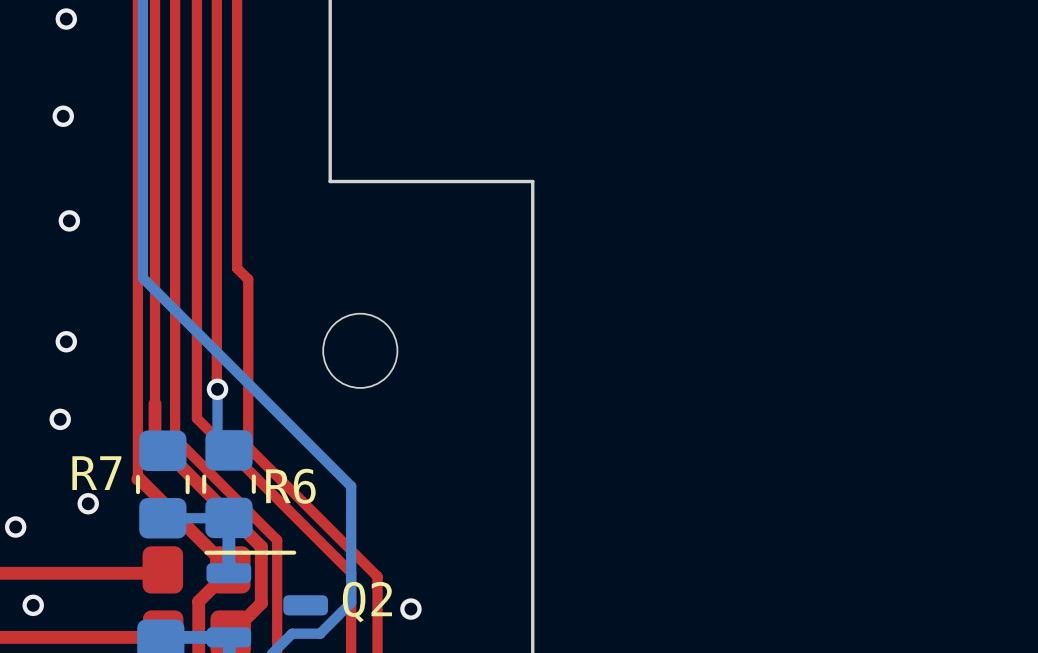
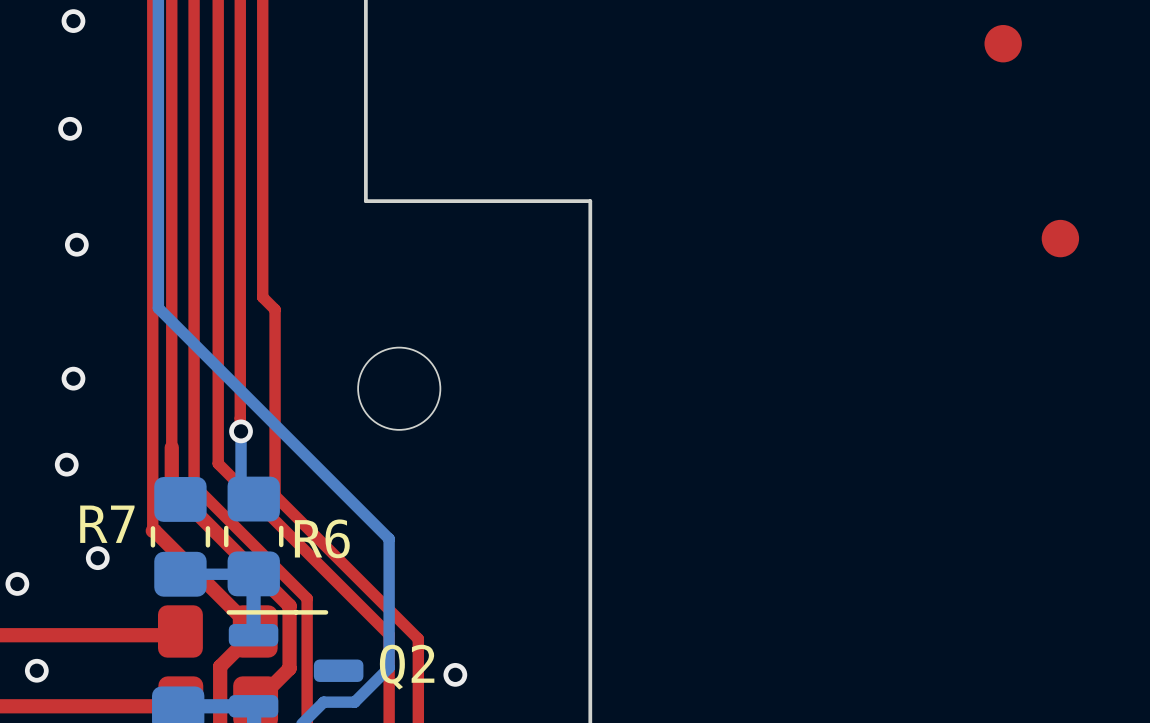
part: none -> (1003, 43)
part: none -> (1060, 238)

